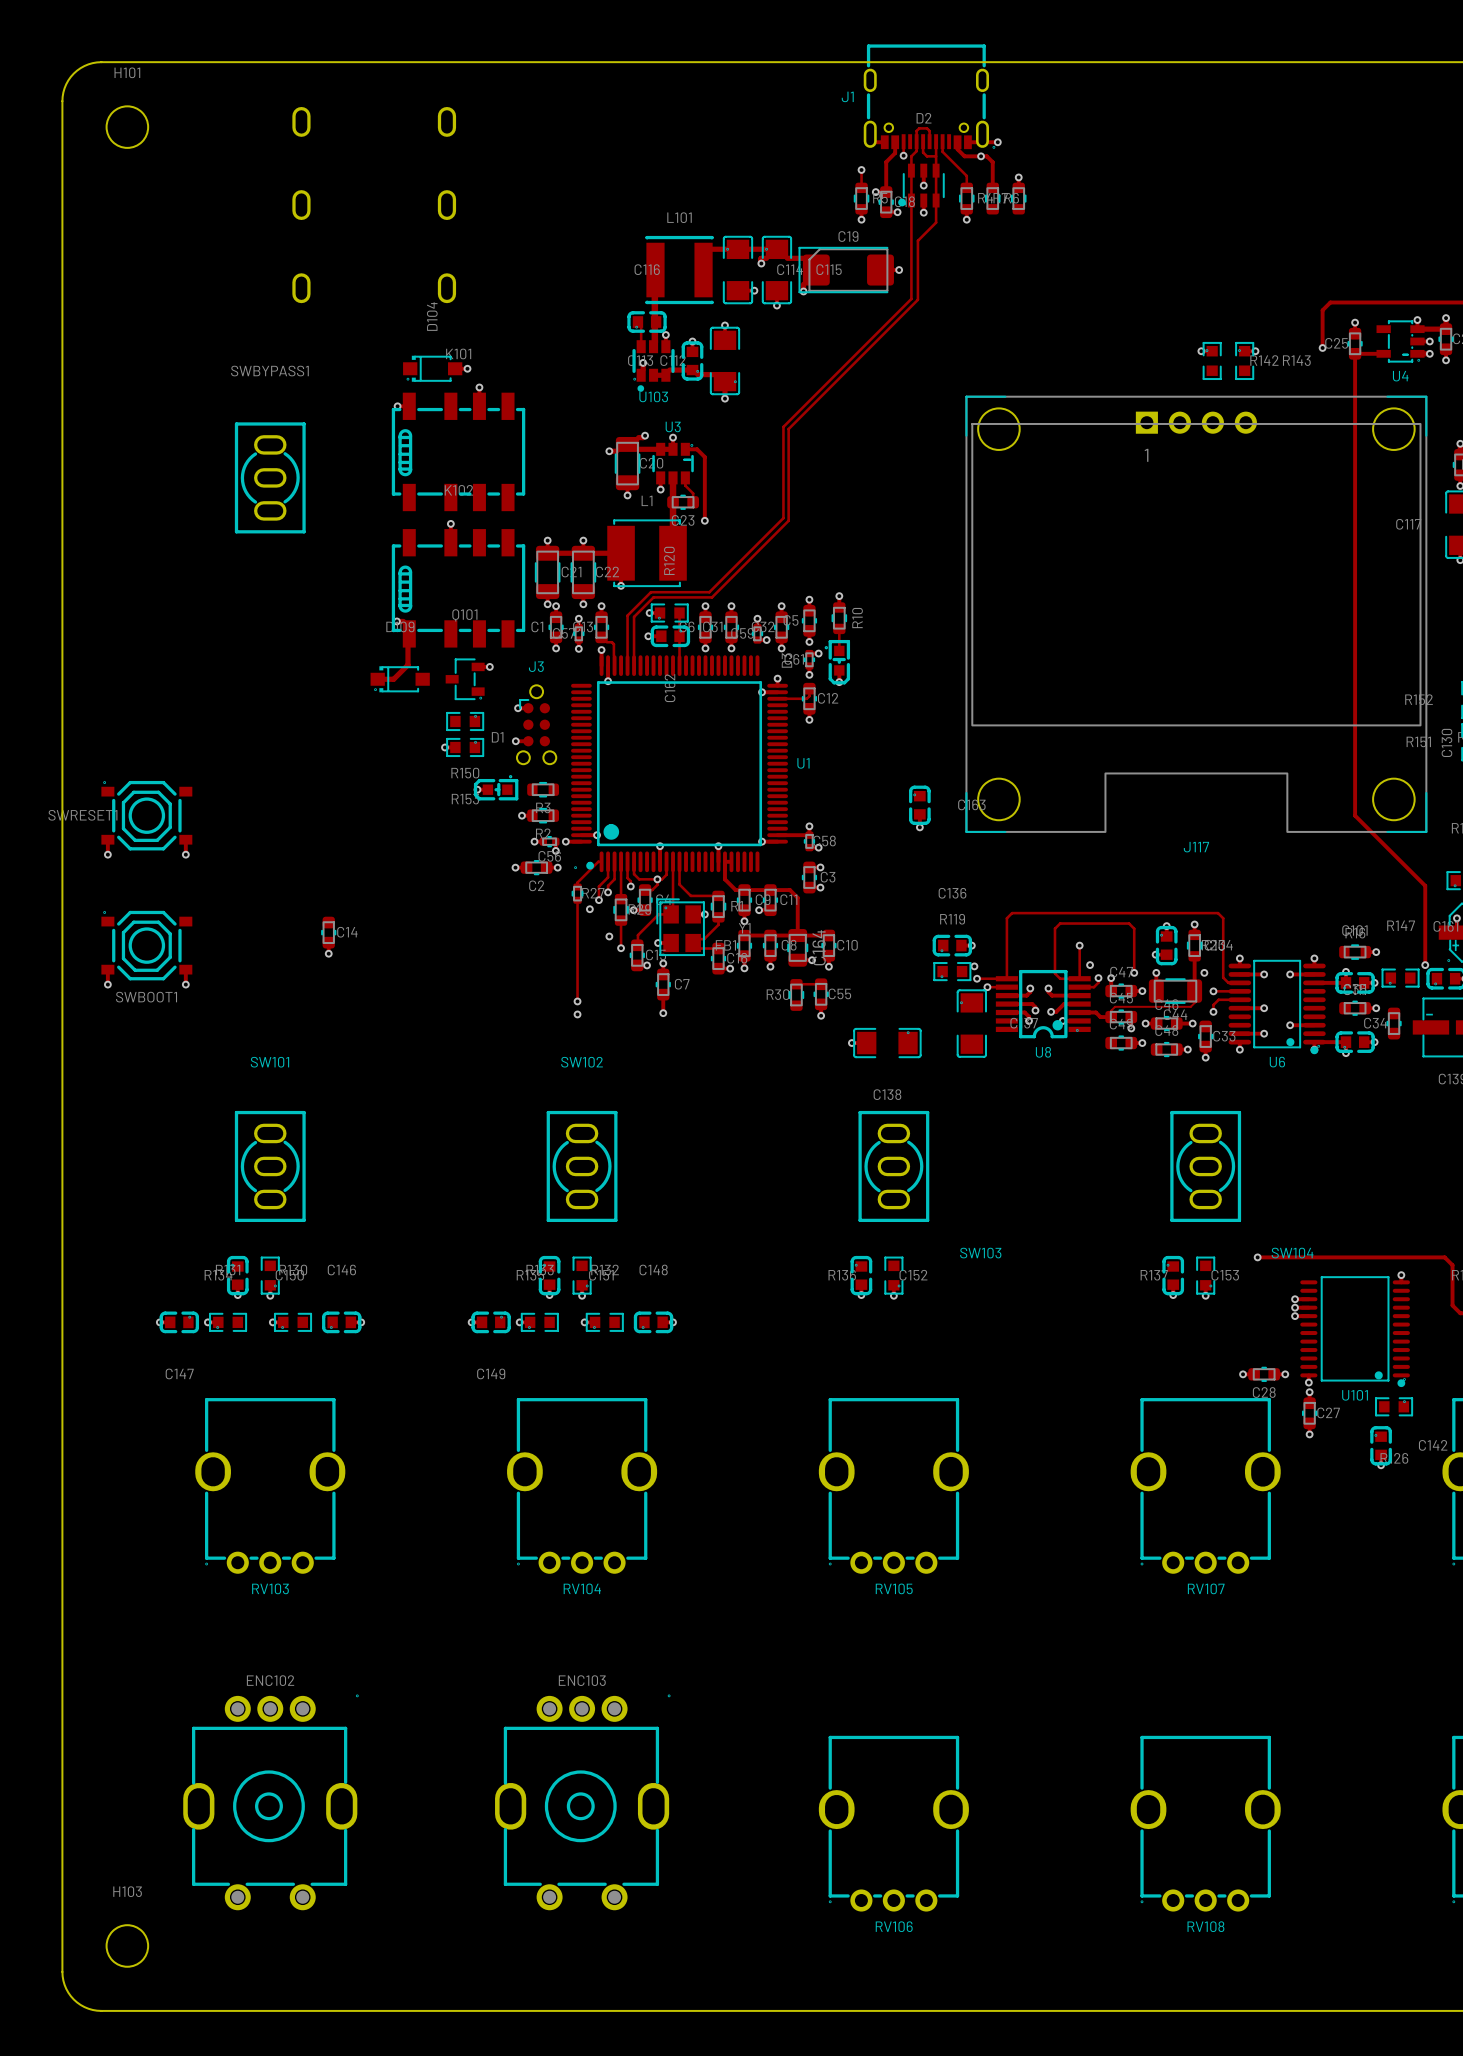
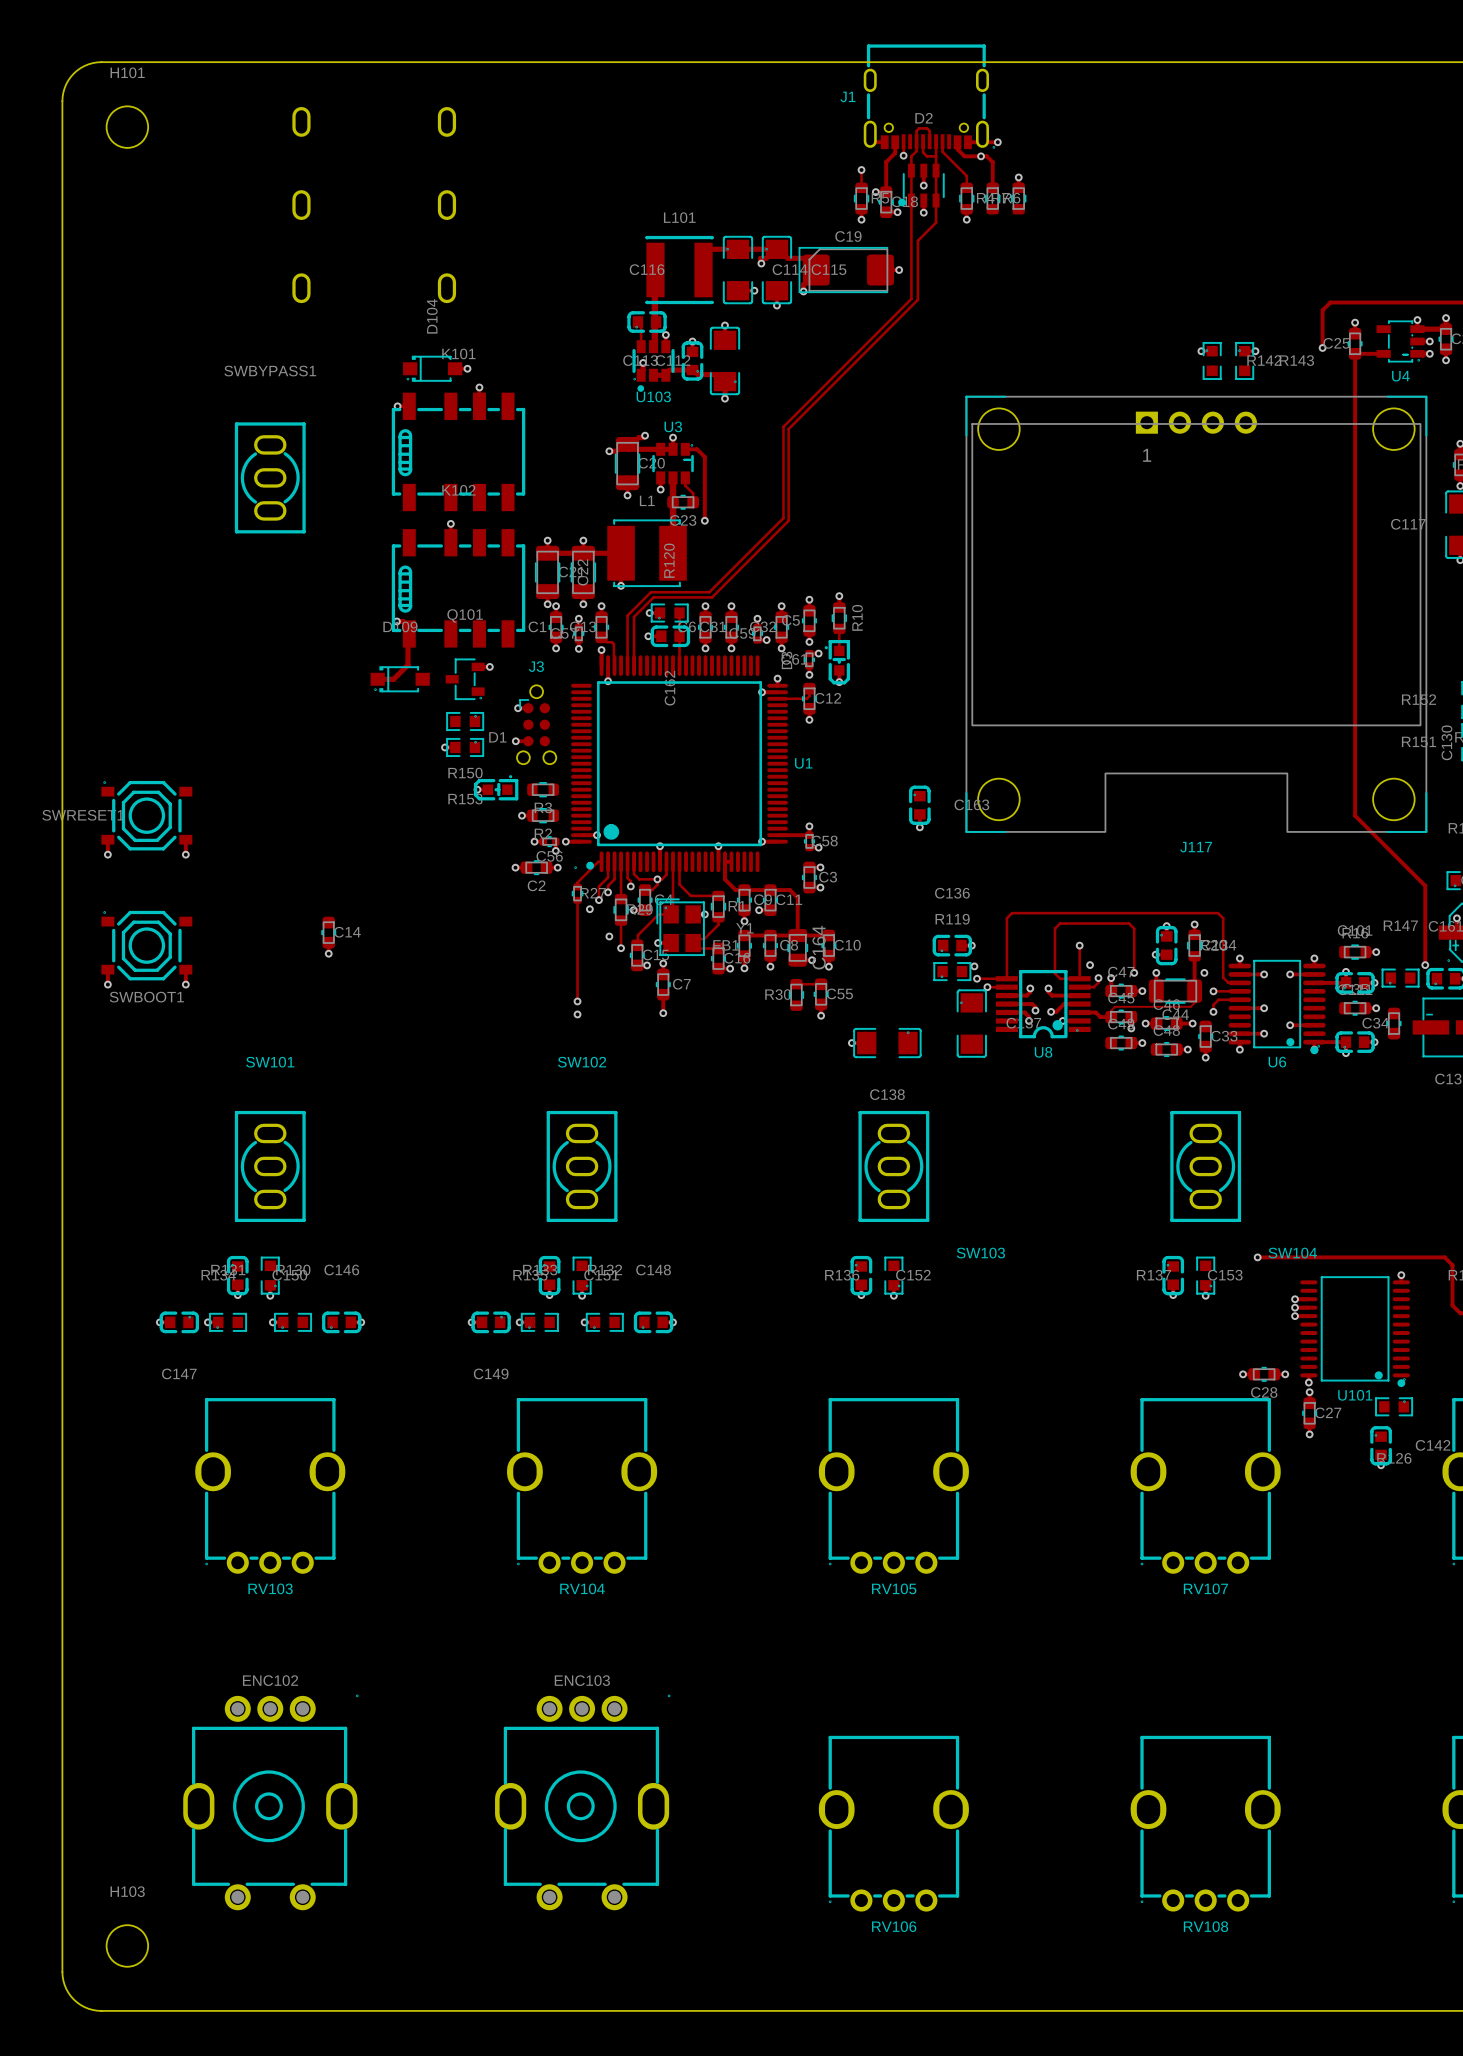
C22 name rotation: 0° (607, 572) -> 90° counterclockwise (582, 572)

